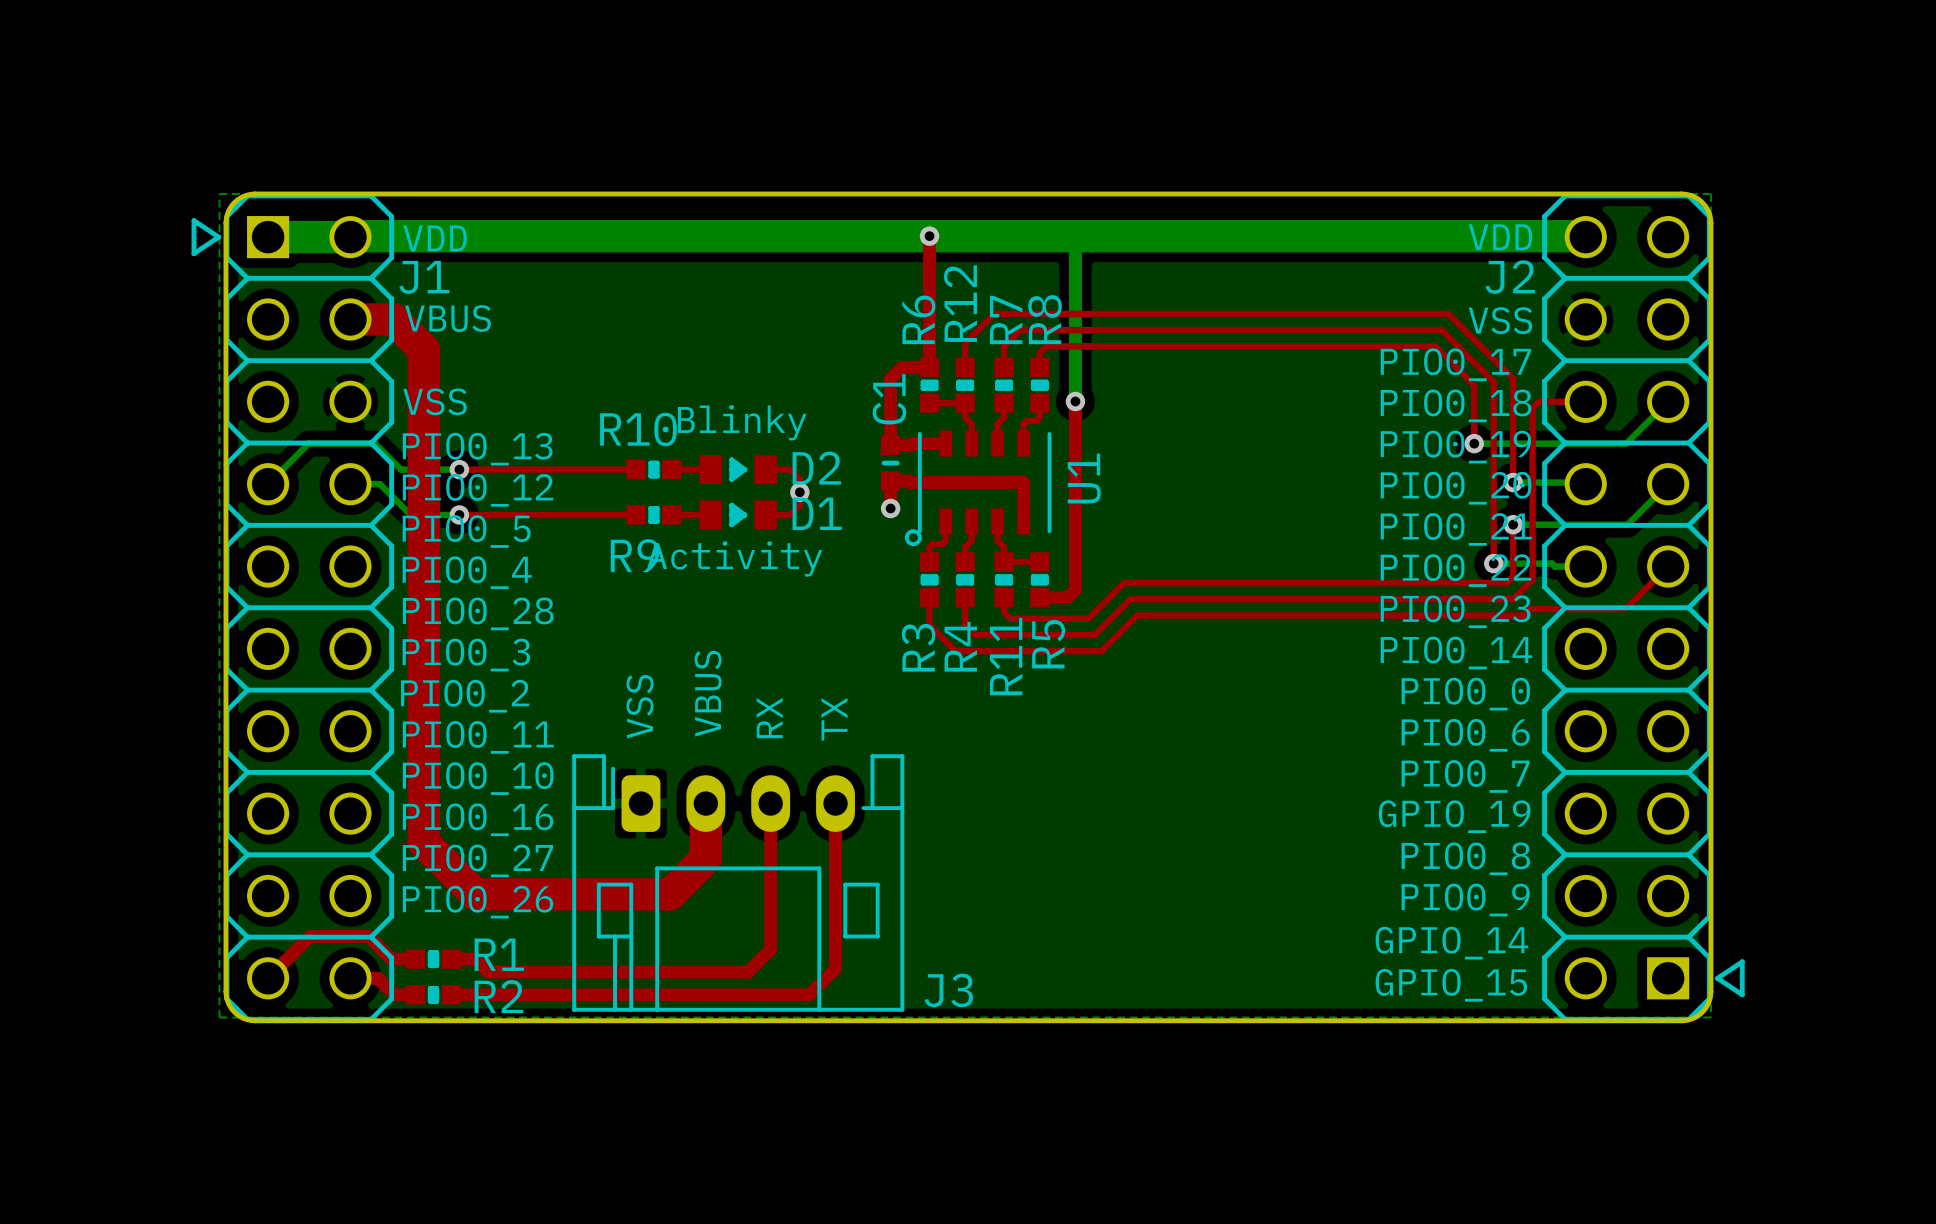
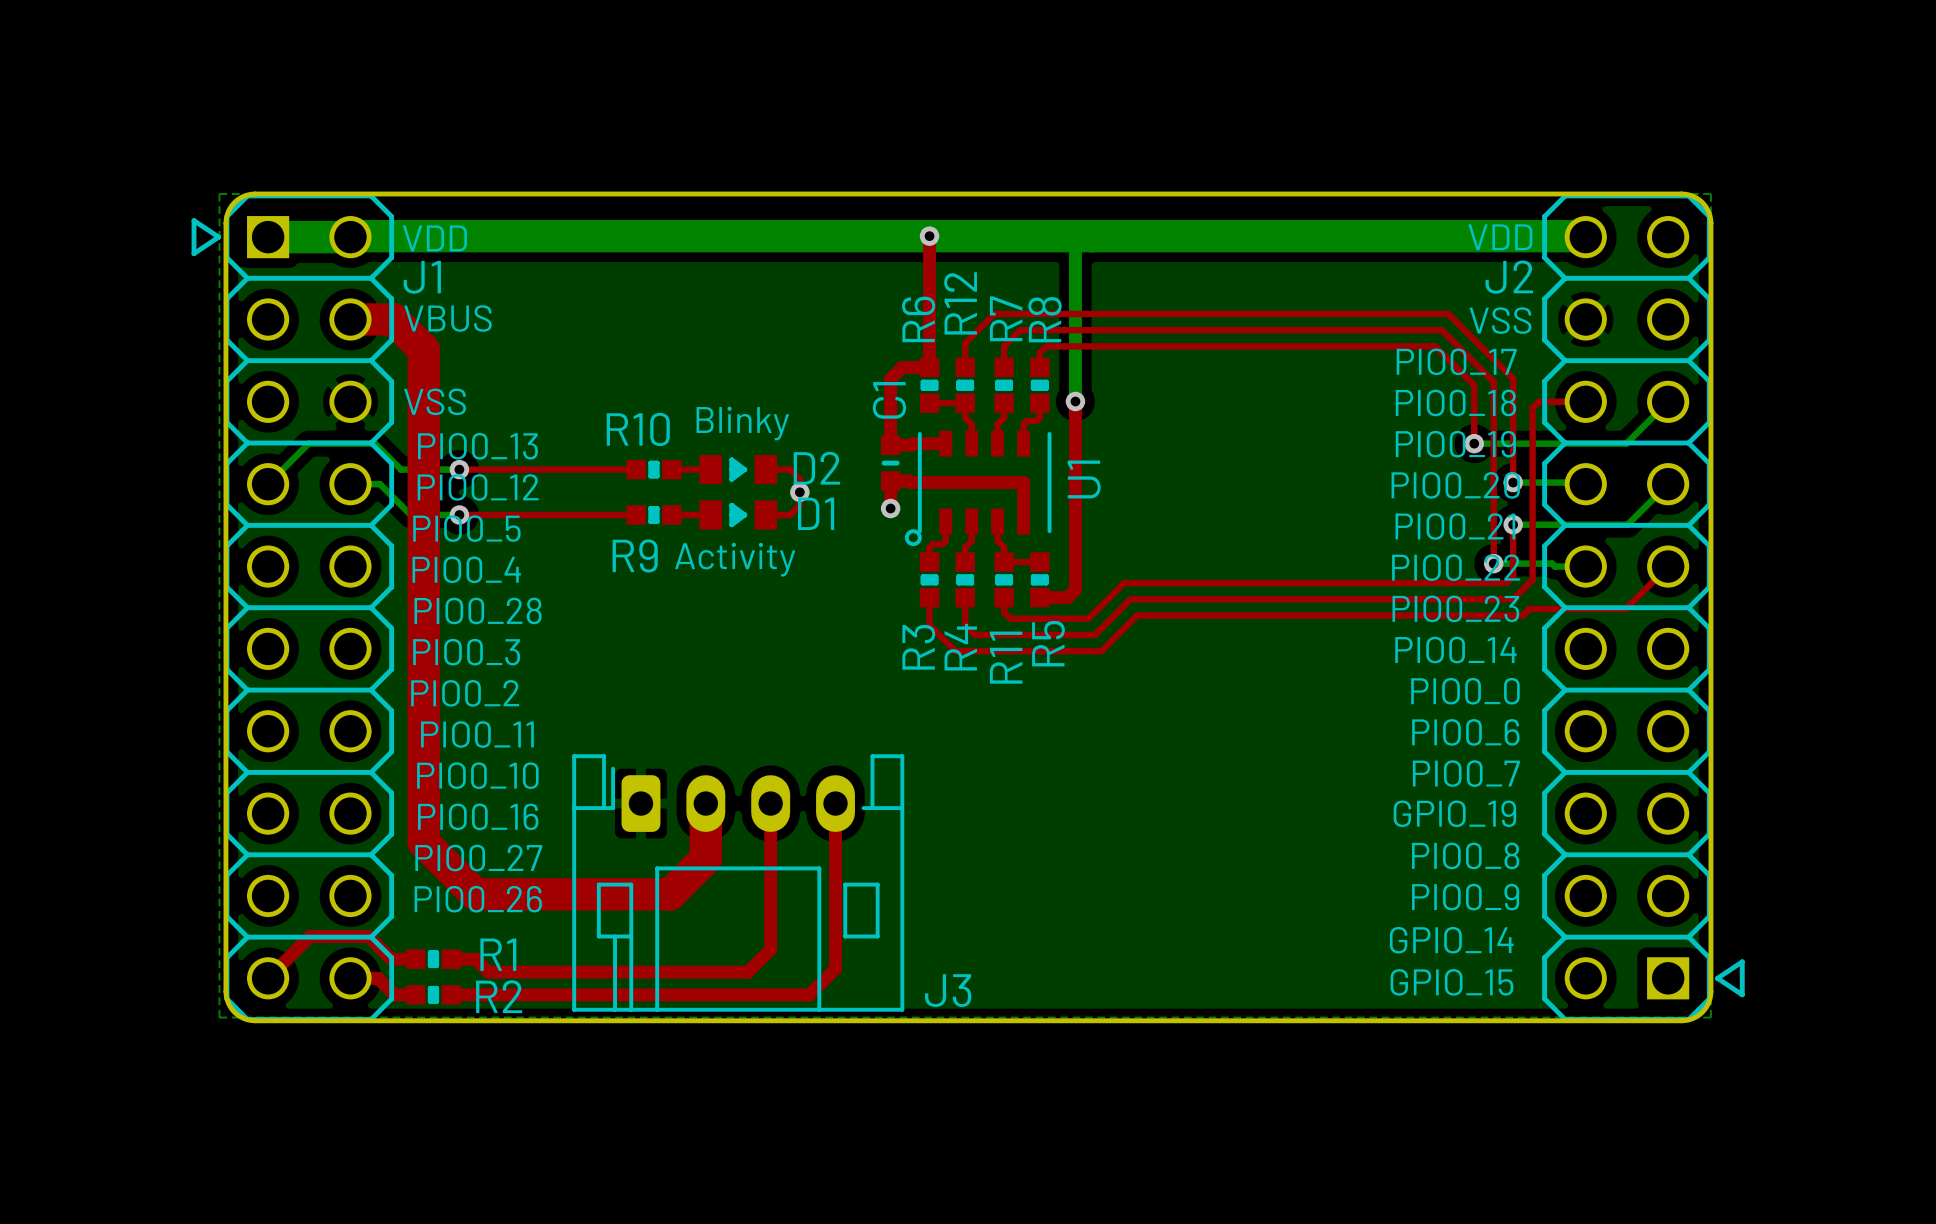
text: VBUS (708, 693) -> none
text: VSS (640, 706) -> none
text: RX (769, 718) -> none
text: TX (834, 719) -> none

